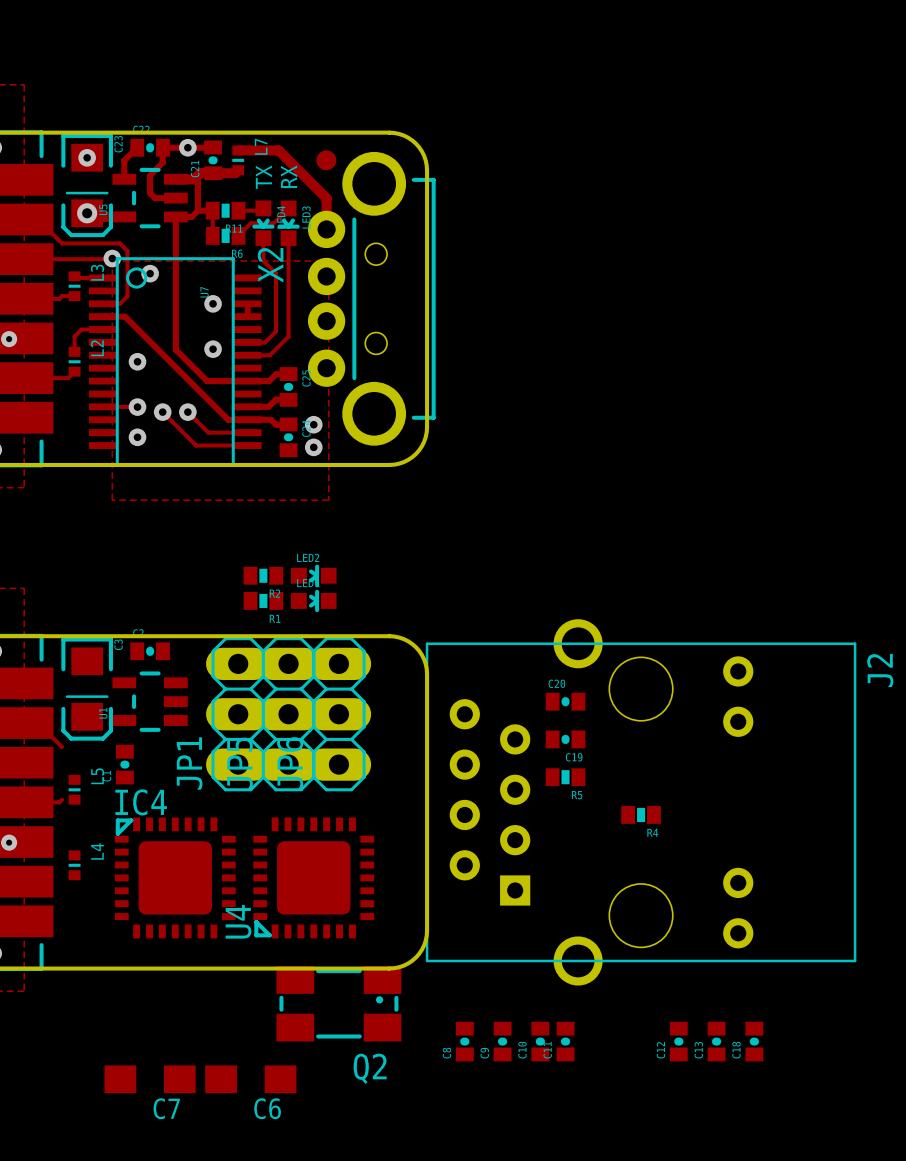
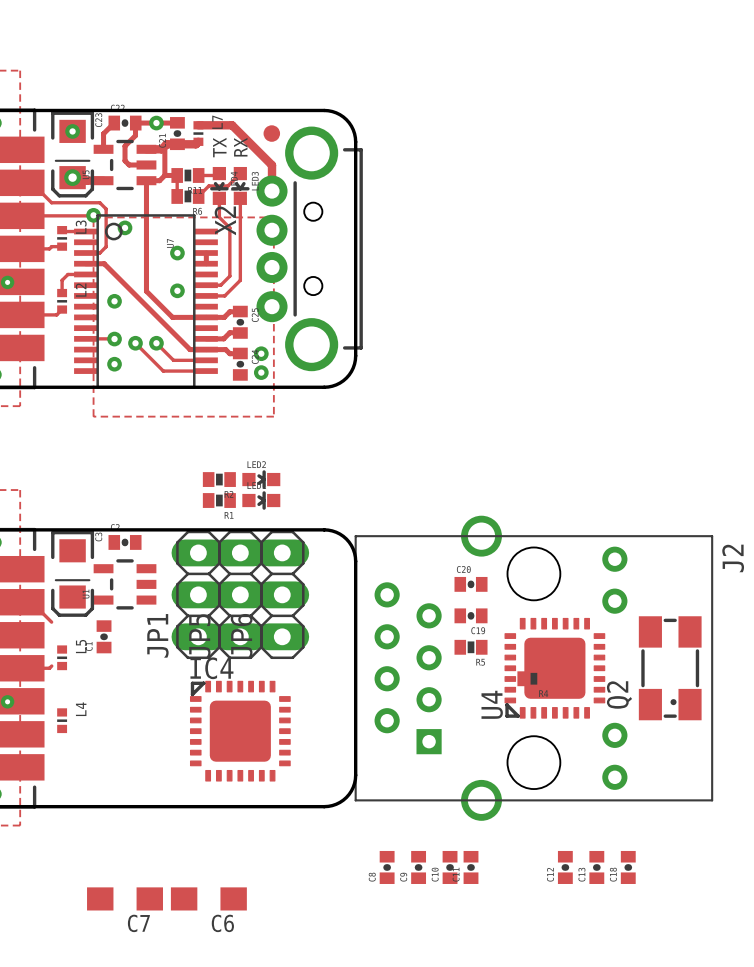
IC4 position: (175, 877) -> (240, 731)
U4 position: (313, 877) -> (554, 668)
Q2 rotation: 0° (338, 1003) -> 90° clockwise (670, 668)
Q2 position: (338, 1003) -> (670, 668)

